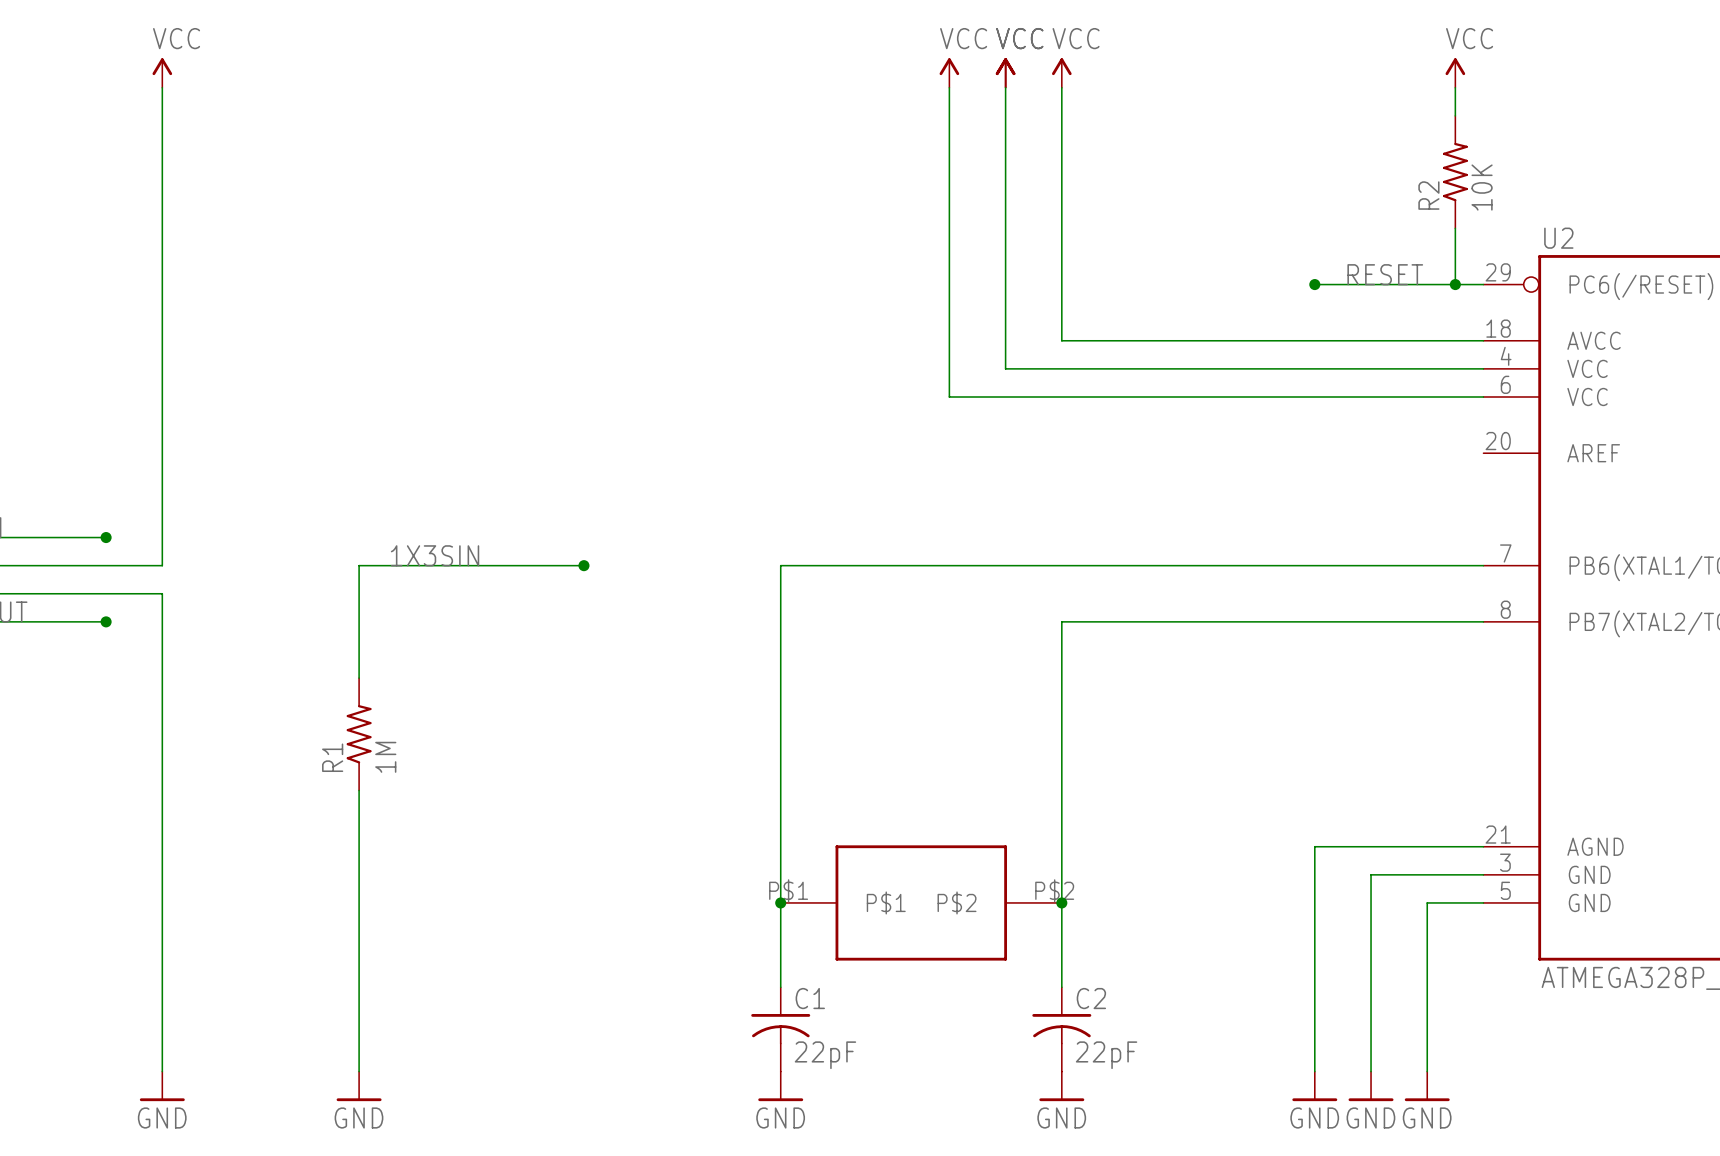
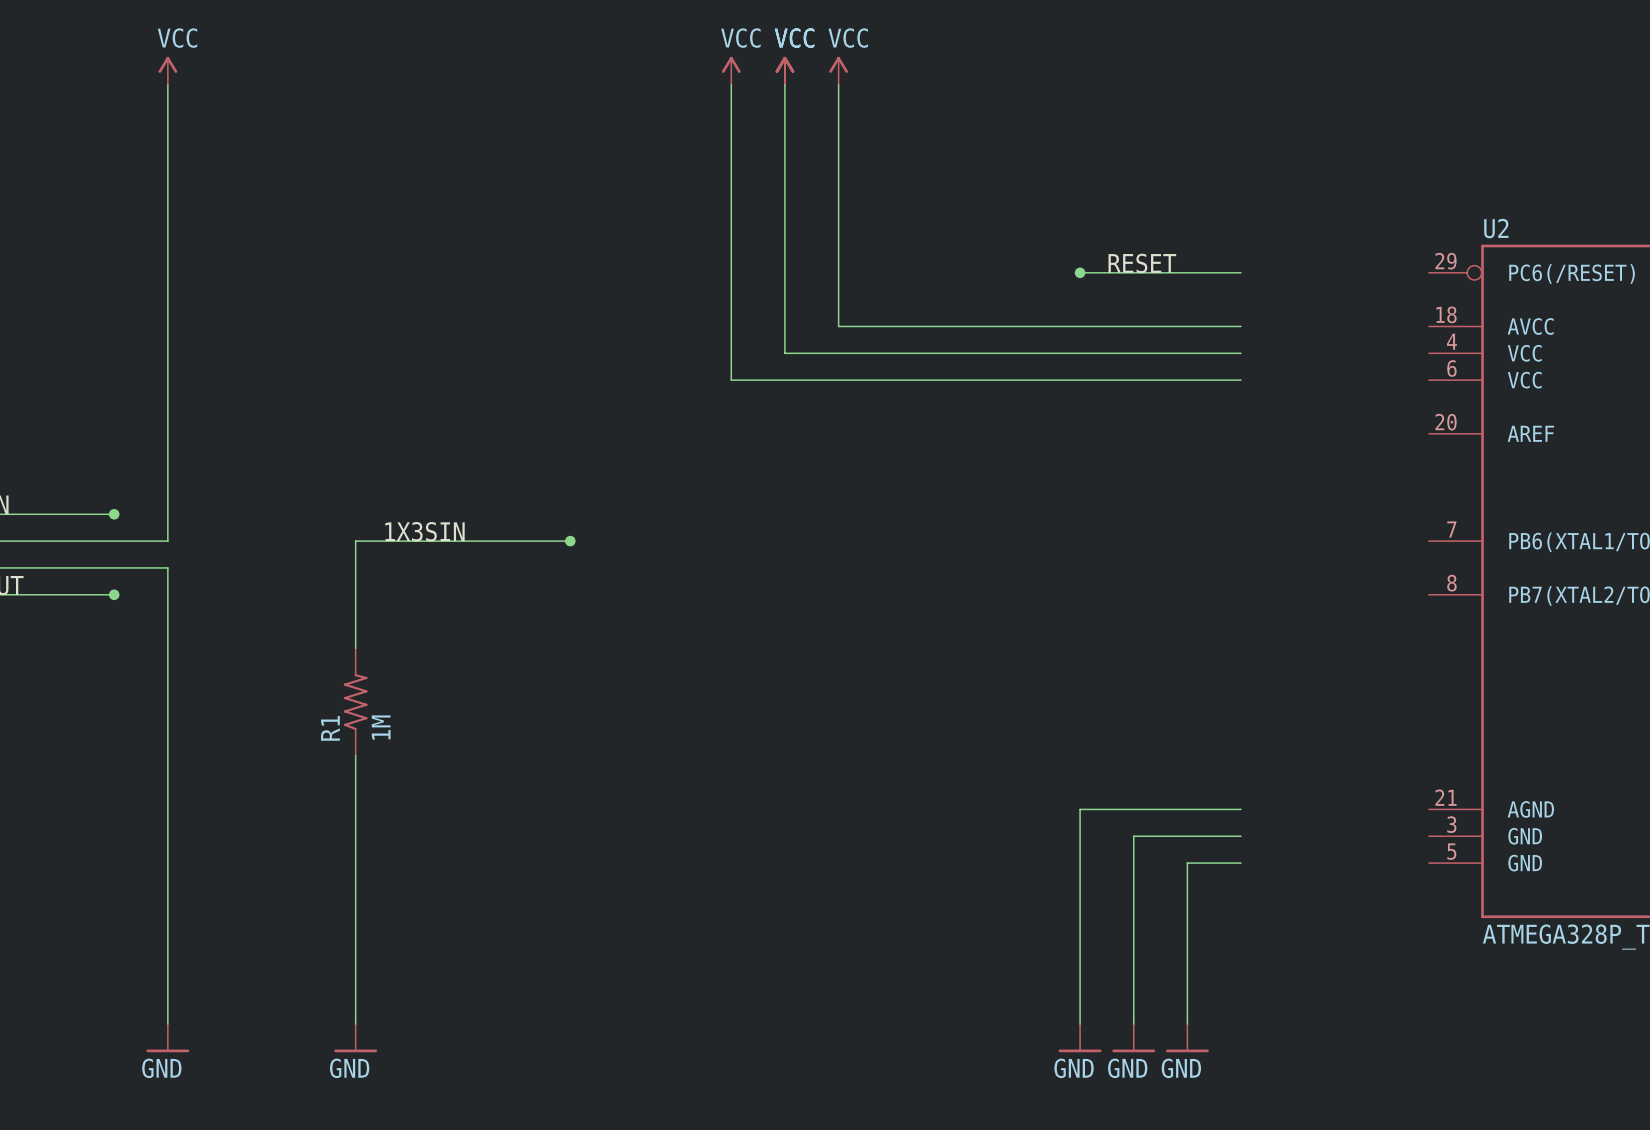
power symbol: none -> VCC (731, 70)
power symbol: none -> VCC (784, 70)
power symbol: none -> VCC (838, 70)
power symbol: VCC (949, 73) -> none
power symbol: VCC (1005, 73) -> none
power symbol: VCC (1061, 73) -> none
power symbol: VCC (1455, 73) -> none
wire: (949, 87) (949, 397) -> (731, 85) (731, 380) (919, 380)
wire: (1005, 87) (1005, 368) -> (784, 85) (784, 353) (972, 353)
wire: (1061, 87) (1061, 340) -> (838, 85) (838, 326) (1026, 326)
wire: (1455, 87) (1455, 115) -> none
R2: 10K (1455, 172) -> none
wire: (1455, 228) (1455, 284) -> none
label position: RESET (1385, 274) -> RESET (1142, 263)
junction: none -> (1080, 272)
wire: (1314, 284) (1483, 284) -> (1080, 272) (1241, 272)
junction: (1314, 284) -> none
junction: (1455, 284) -> none
wire: (1286, 340) (1483, 340) -> none
wire: (1286, 368) (1483, 368) -> none
wire: (1286, 397) (1483, 397) -> none
wire: (1483, 565) (780, 565) (780, 987) -> none
wire: (1483, 621) (1061, 621) (1061, 987) -> none
wire: (1483, 846) (1314, 846) (1314, 1071) -> (1241, 809) (1080, 809) (1080, 1024)
wire: (1483, 874) (1371, 874) (1371, 1071) -> (1241, 836) (1133, 836) (1133, 1024)
junction: (780, 902) -> none
part: (921, 902) -> none
junction: (1061, 902) -> none
wire: (1483, 902) (1427, 902) (1427, 1071) -> (1241, 863) (1187, 863) (1187, 1024)
C1: 22pF (780, 1029) -> none
C2: 22pF (1061, 1029) -> none
power symbol: GND (780, 1086) -> none
power symbol: GND (1061, 1086) -> none
power symbol: none -> GND (1080, 1038)
power symbol: none -> GND (1133, 1038)
power symbol: none -> GND (1187, 1038)
power symbol: GND (1314, 1086) -> none
power symbol: GND (1371, 1086) -> none
power symbol: GND (1427, 1086) -> none

